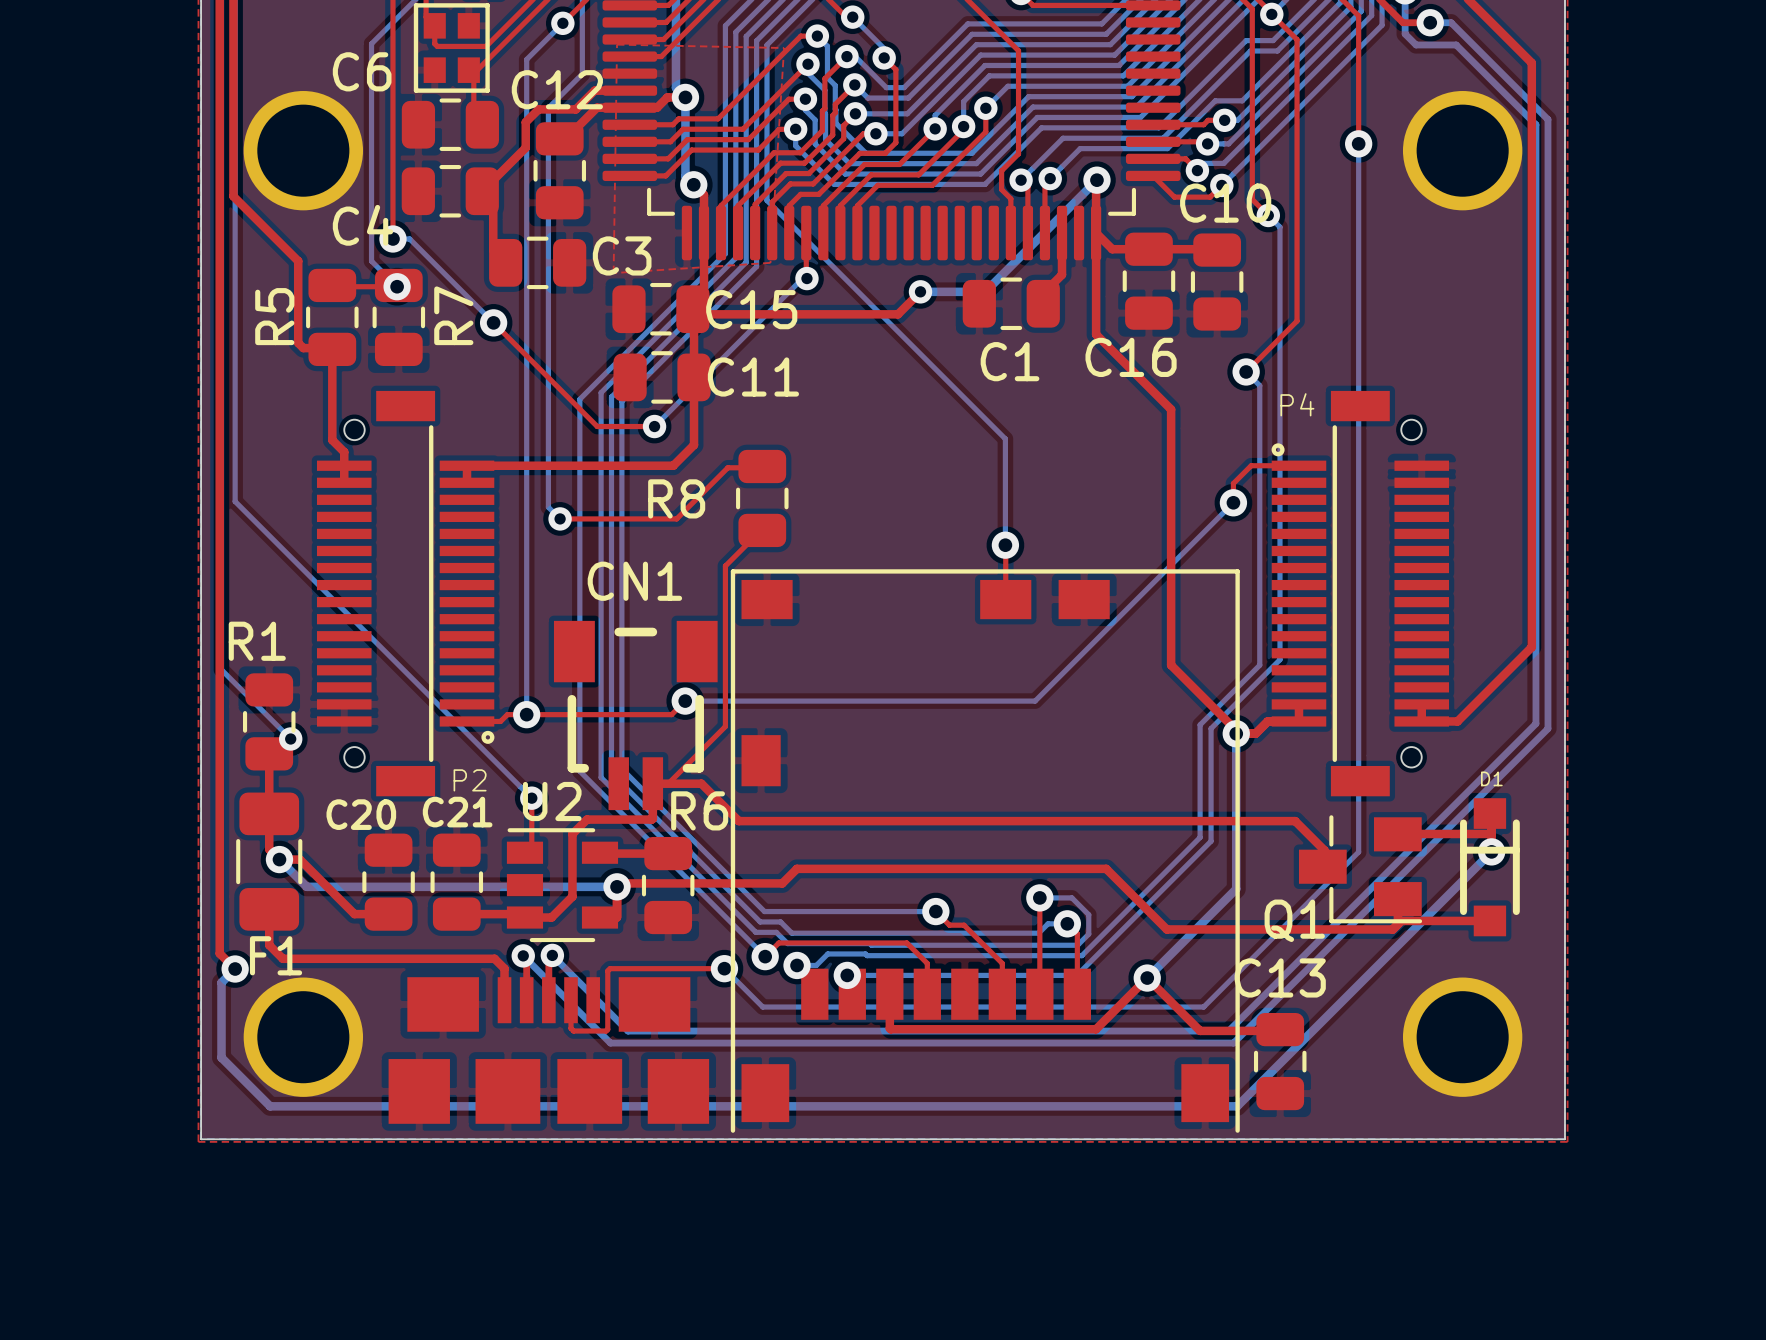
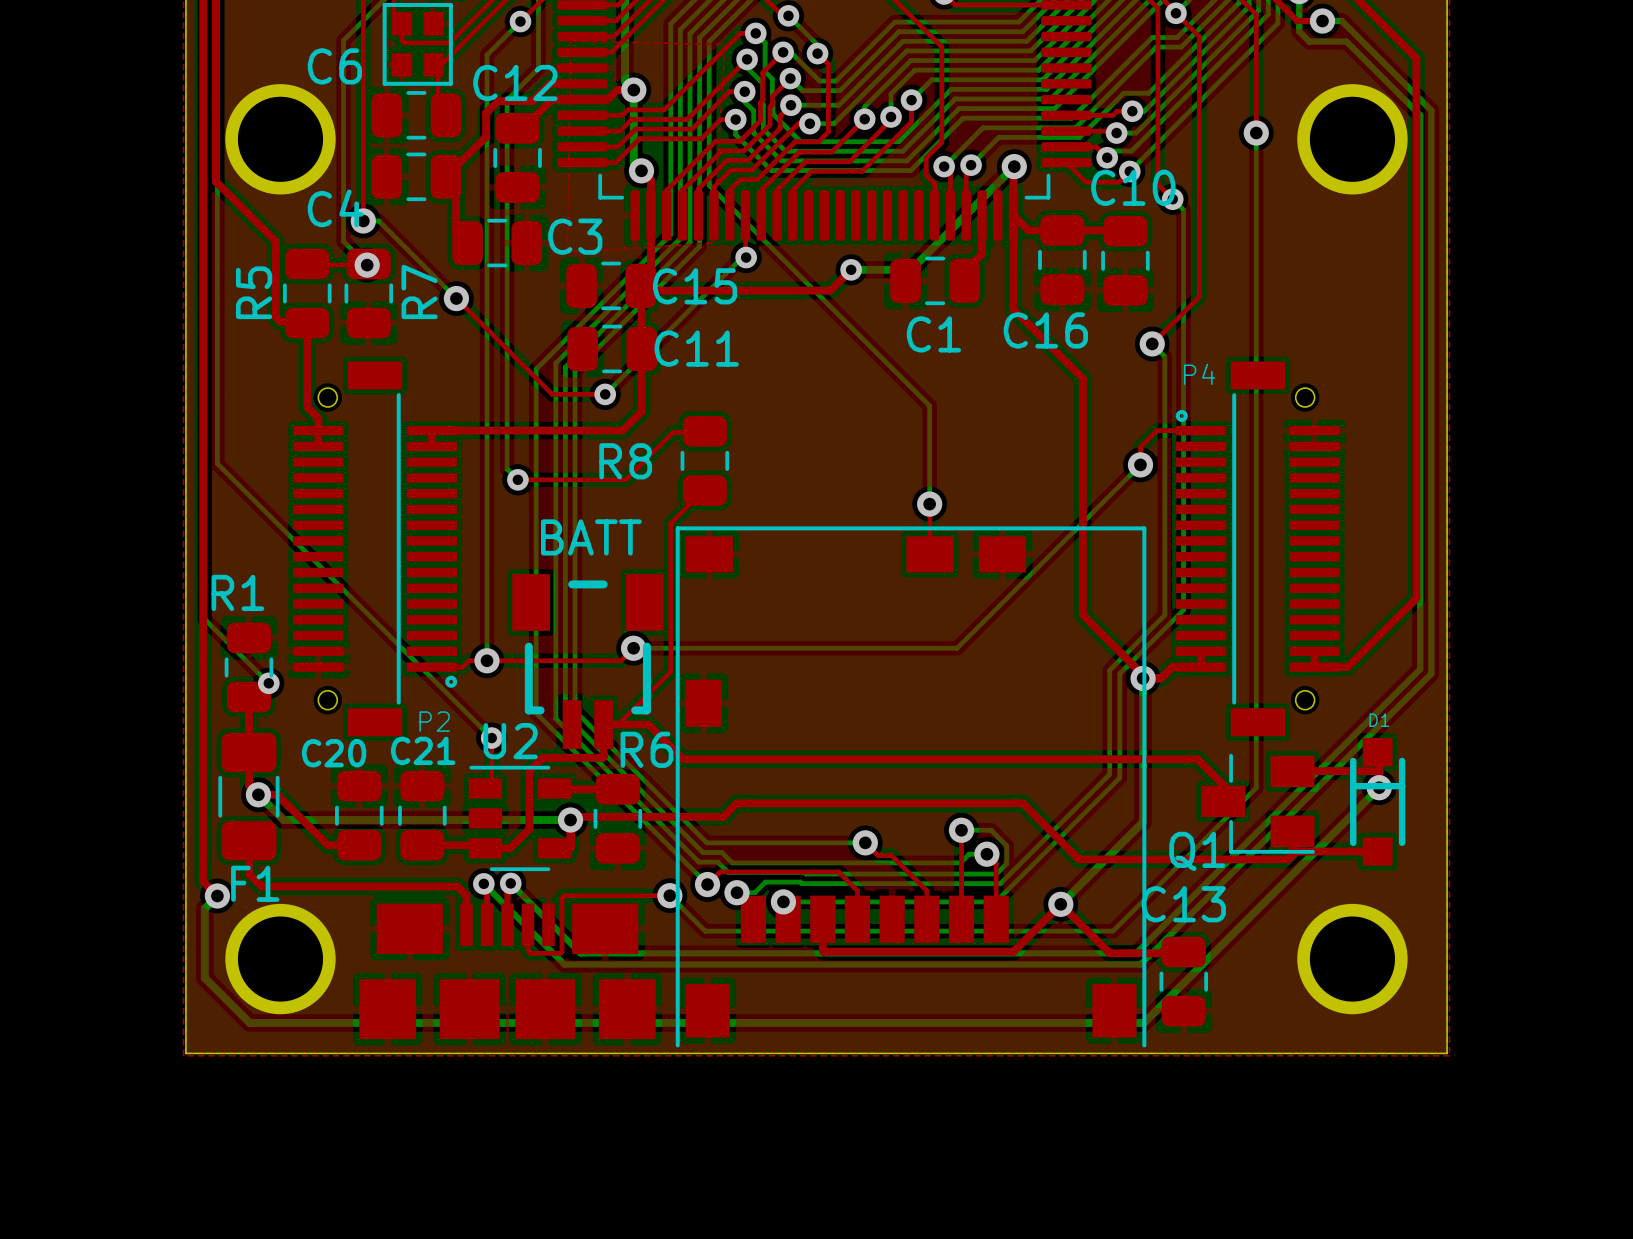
CN1 name: CN1 (634, 581) -> BATT (591, 537)

